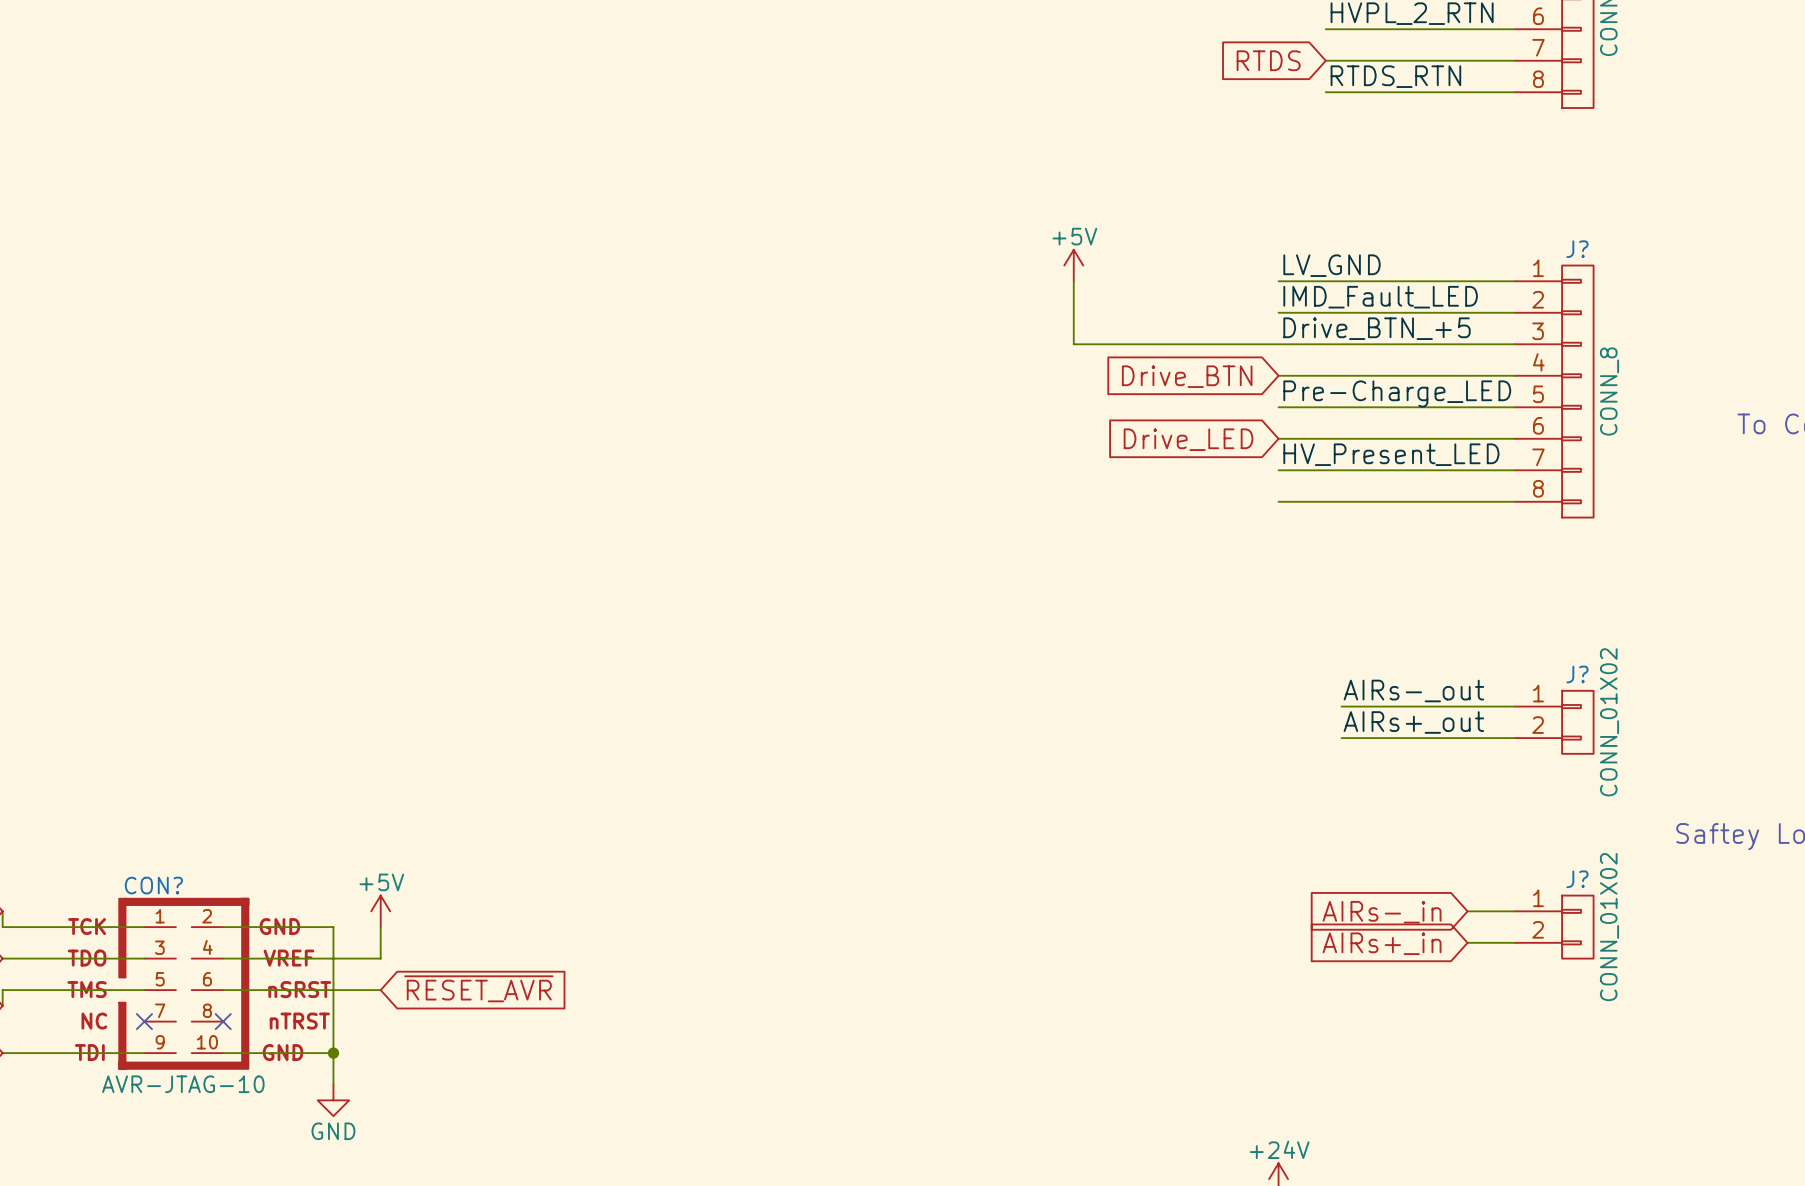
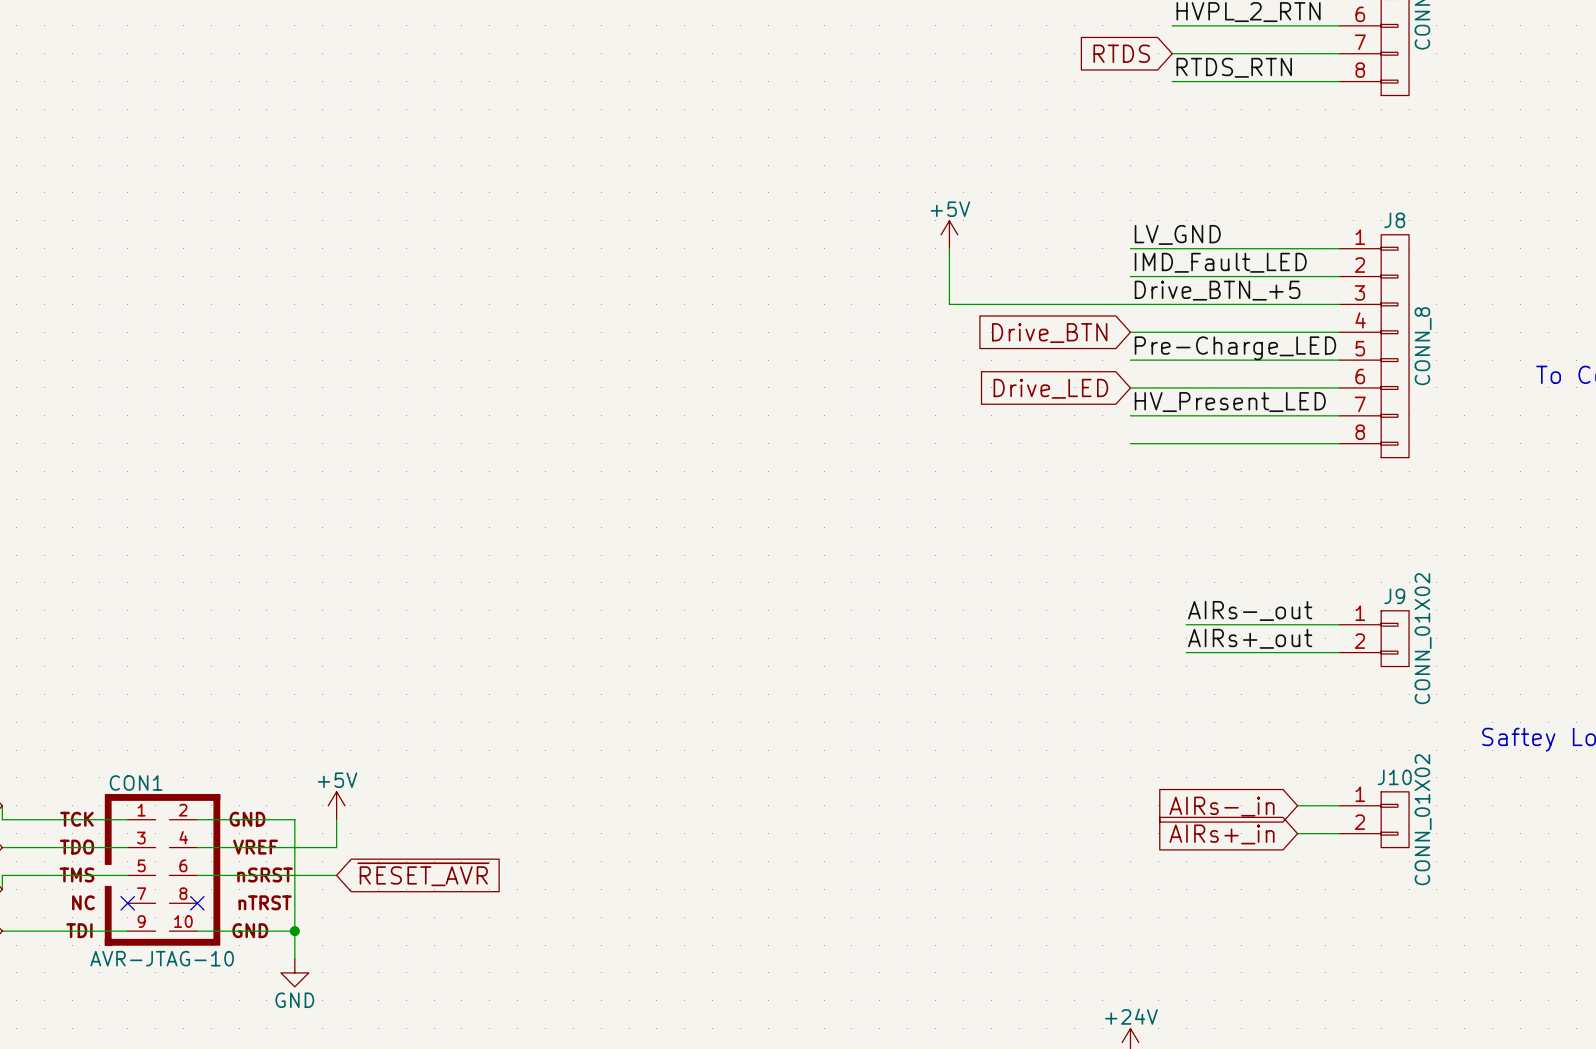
J? name: J? (1577, 249) -> J8 (1394, 220)
J? name: J? (1577, 674) -> J9 (1394, 596)
J? name: J? (1577, 879) -> J10 (1394, 777)
CON? name: CON? (153, 885) -> CON1 (136, 782)

